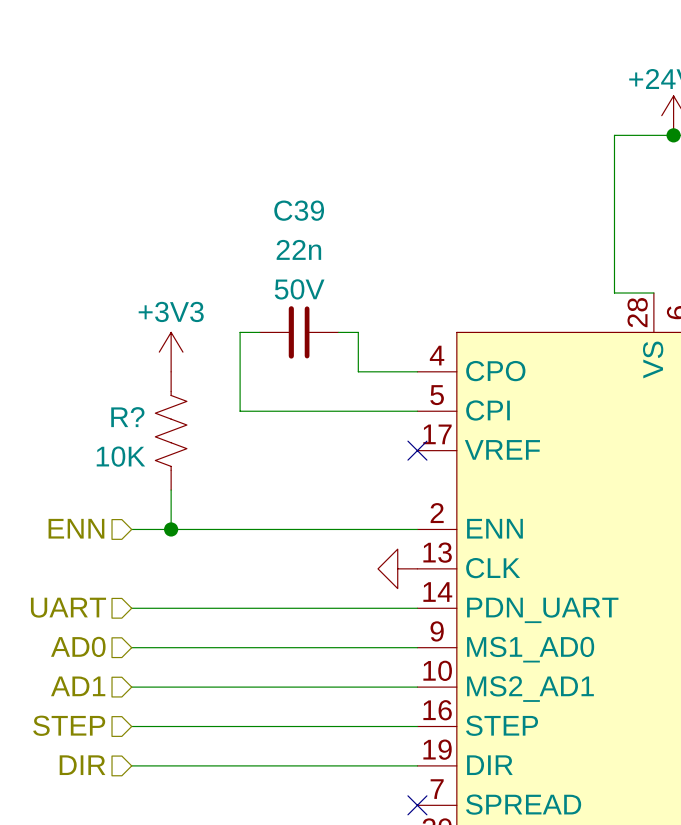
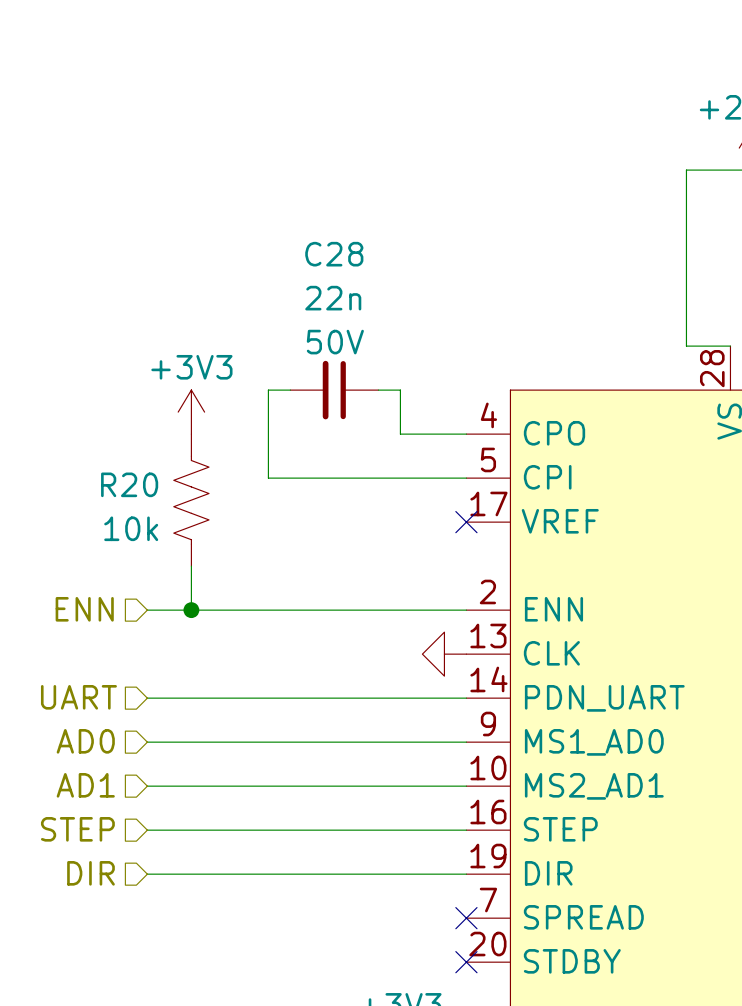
C39 name: C39 (299, 210) -> C28 (334, 254)
R? name: R? (127, 417) -> R20 (129, 484)
R? value: 10K (120, 456) -> 10k (131, 528)

